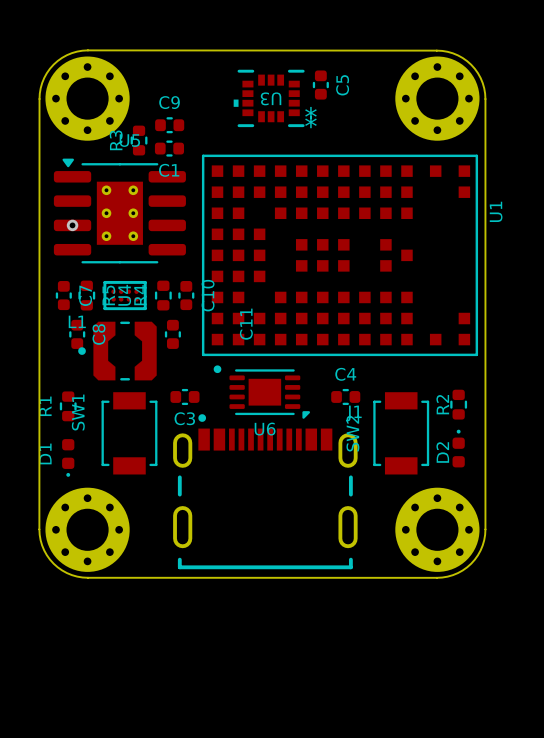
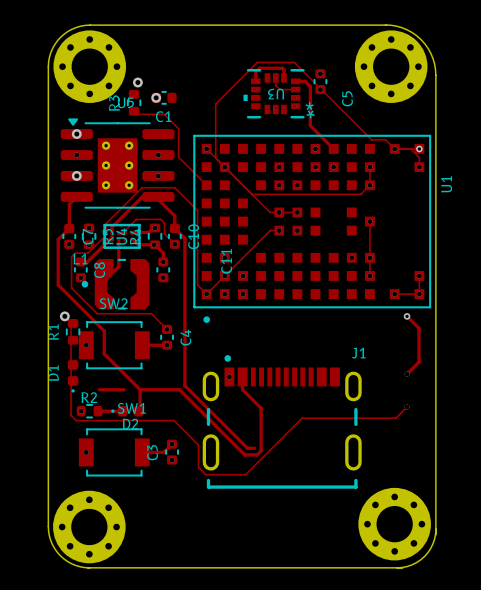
board edge: (87, 50) (436, 50) (457, 55) (474, 68) (482, 83) (485, 99) (485, 529) (480, 550) (471, 563) (452, 575) (436, 577) (88, 577) (71, 575) (53, 563) (42, 545) (39, 529) (39, 99) -> (90, 25) (386, 25)
board edge: none -> (385, 24) (402, 27) (416, 35) (430, 53) (435, 69) (435, 534)
C5 position: (320, 85) -> (320, 81)
C5 name position: C5 (342, 85) -> C5 (347, 98)
U3 position: (269, 98) -> (274, 93)
board edge: none -> (48, 67) (48, 531) (52, 544) (63, 558) (76, 565) (89, 567)
via: none -> (283, 69)
via: none -> (320, 73)
via: none -> (267, 77)
track: none -> (275, 77) (275, 85) (279, 89) (295, 89)
via: none -> (275, 77)
track: none -> (284, 77) (282, 68) (259, 68) (255, 72) (255, 81)
track: none -> (295, 81) (305, 81) (310, 86) (310, 125) (333, 148)
via: none -> (137, 82)
C9: (169, 125) -> none
via: none -> (255, 89)
via: none -> (295, 89)
via: none -> (320, 89)
via: none -> (156, 97)
via: none -> (295, 97)
via: none -> (295, 106)
via: none -> (275, 108)
C1 position: (169, 148) -> (164, 97)
via: none -> (267, 109)
via: none -> (284, 109)
track: none -> (134, 114) (164, 114) (178, 128) (178, 157) (206, 185)
via: none -> (76, 134)
track: none -> (206, 148) (270, 212) (297, 212)
via: none -> (206, 148)
via: none -> (315, 148)
via: none -> (394, 148)
track: none -> (410, 148) (419, 157) (419, 167)
track: none -> (419, 148) (394, 148) (385, 139) (371, 139) (294, 62) (257, 62) (215, 103) (215, 158)
via: none -> (419, 148)
via: none -> (76, 155)
via: none -> (158, 155)
via: none -> (224, 167)
via: none -> (279, 167)
via: none -> (315, 167)
via: none -> (333, 167)
track: none -> (369, 167) (369, 185) (360, 194) (252, 194)
via: none -> (369, 167)
via: none -> (419, 167)
via: none -> (158, 175)
via: none -> (279, 185)
via: none -> (297, 185)
via: none -> (369, 185)
track: none -> (76, 196) (69, 204) (69, 228) (58, 239) (58, 285) (104, 331) (104, 353) (140, 389)
U1 position: (339, 263) -> (312, 228)
via: none -> (279, 212)
via: none -> (297, 212)
track: none -> (369, 221) (369, 275)
via: none -> (369, 221)
via: none -> (89, 227)
track: none -> (155, 227) (148, 232) (131, 232)
via: none -> (155, 227)
track: none -> (279, 230) (270, 230) (206, 294) (197, 285) (197, 210) (174, 187) (142, 187) (106, 223) (106, 234) (88, 253) (75, 253) (71, 256) (71, 288) (97, 313) (151, 313) (167, 329)
via: none -> (279, 230)
via: none -> (297, 230)
track: none -> (118, 233) (125, 233) (125, 230) (136, 219) (160, 219) (164, 223) (164, 233) (174, 244)
track: none -> (132, 239) (138, 244) (155, 244) (163, 253) (163, 261)
track: none -> (118, 242) (118, 266) (101, 284)
via: none -> (69, 244)
via: none -> (174, 244)
via: none -> (89, 244)
via: none -> (154, 244)
via: none -> (224, 257)
via: none -> (351, 257)
via: none -> (369, 257)
track: none -> (80, 261) (87, 261) (109, 239) (112, 239) (112, 227) (142, 196) (158, 196) (158, 199) (174, 216) (174, 228) (184, 238) (184, 385) (247, 448) (254, 448)
via: none -> (163, 261)
via: none -> (224, 275)
via: none -> (242, 275)
via: none -> (369, 275)
track: none -> (419, 275) (419, 294) (394, 294)
via: none -> (419, 275)
via: none -> (80, 277)
via: none -> (163, 277)
via: none -> (206, 294)
via: none -> (224, 294)
via: none -> (242, 294)
via: none -> (394, 294)
via: none -> (419, 294)
track: none -> (64, 316) (71, 322) (71, 415) (76, 420) (174, 420) (198, 445) (198, 467) (205, 474) (245, 474) (302, 418) (395, 418) (407, 407)
via: none -> (64, 316)
track: none -> (407, 316) (419, 328) (419, 362) (407, 374)
via: none -> (407, 316)
U6: (269, 394) -> none
C3 rotation: 0° (184, 396) -> 90° clockwise (172, 452)
C3 position: (184, 396) -> (172, 452)
C4 rotation: 0° (345, 396) -> 90° clockwise (167, 337)
C4 position: (345, 396) -> (167, 337)
via: none -> (167, 329)
R2 rotation: 0° (458, 404) -> 90° clockwise (89, 411)
R2 position: (458, 404) -> (89, 411)
via: none -> (86, 345)
track: none -> (142, 345) (167, 345)
via: none -> (167, 345)
SW1 rotation: 0° (129, 433) -> 90° clockwise (114, 452)
SW1 position: (129, 433) -> (114, 452)
SW2 rotation: 0° (401, 433) -> 90° clockwise (114, 345)
SW2 position: (401, 433) -> (114, 345)
D2 rotation: 0° (458, 448) -> 90° counterclockwise (127, 411)
D2 position: (458, 448) -> (127, 411)
via: none -> (407, 374)
via: none -> (229, 376)
track: none -> (242, 376) (242, 389) (261, 408) (261, 451) (257, 454) (244, 454) (179, 389) (140, 389)
track: none -> (99, 389) (124, 389)
track: none -> (140, 389) (138, 411)
J1 position: (265, 491) -> (282, 421)
via: none -> (407, 407)
via: none -> (81, 411)
track: none -> (97, 411) (122, 411)
part position: (87, 529) -> (89, 527)
part position: (437, 529) -> (394, 524)
track: none -> (172, 444) (163, 452) (142, 452)
via: none -> (172, 444)
via: none -> (86, 452)
via: none -> (172, 460)
board edge: none -> (435, 529) (432, 543) (424, 556) (411, 564) (397, 567)
board edge: none -> (87, 567) (402, 567)

